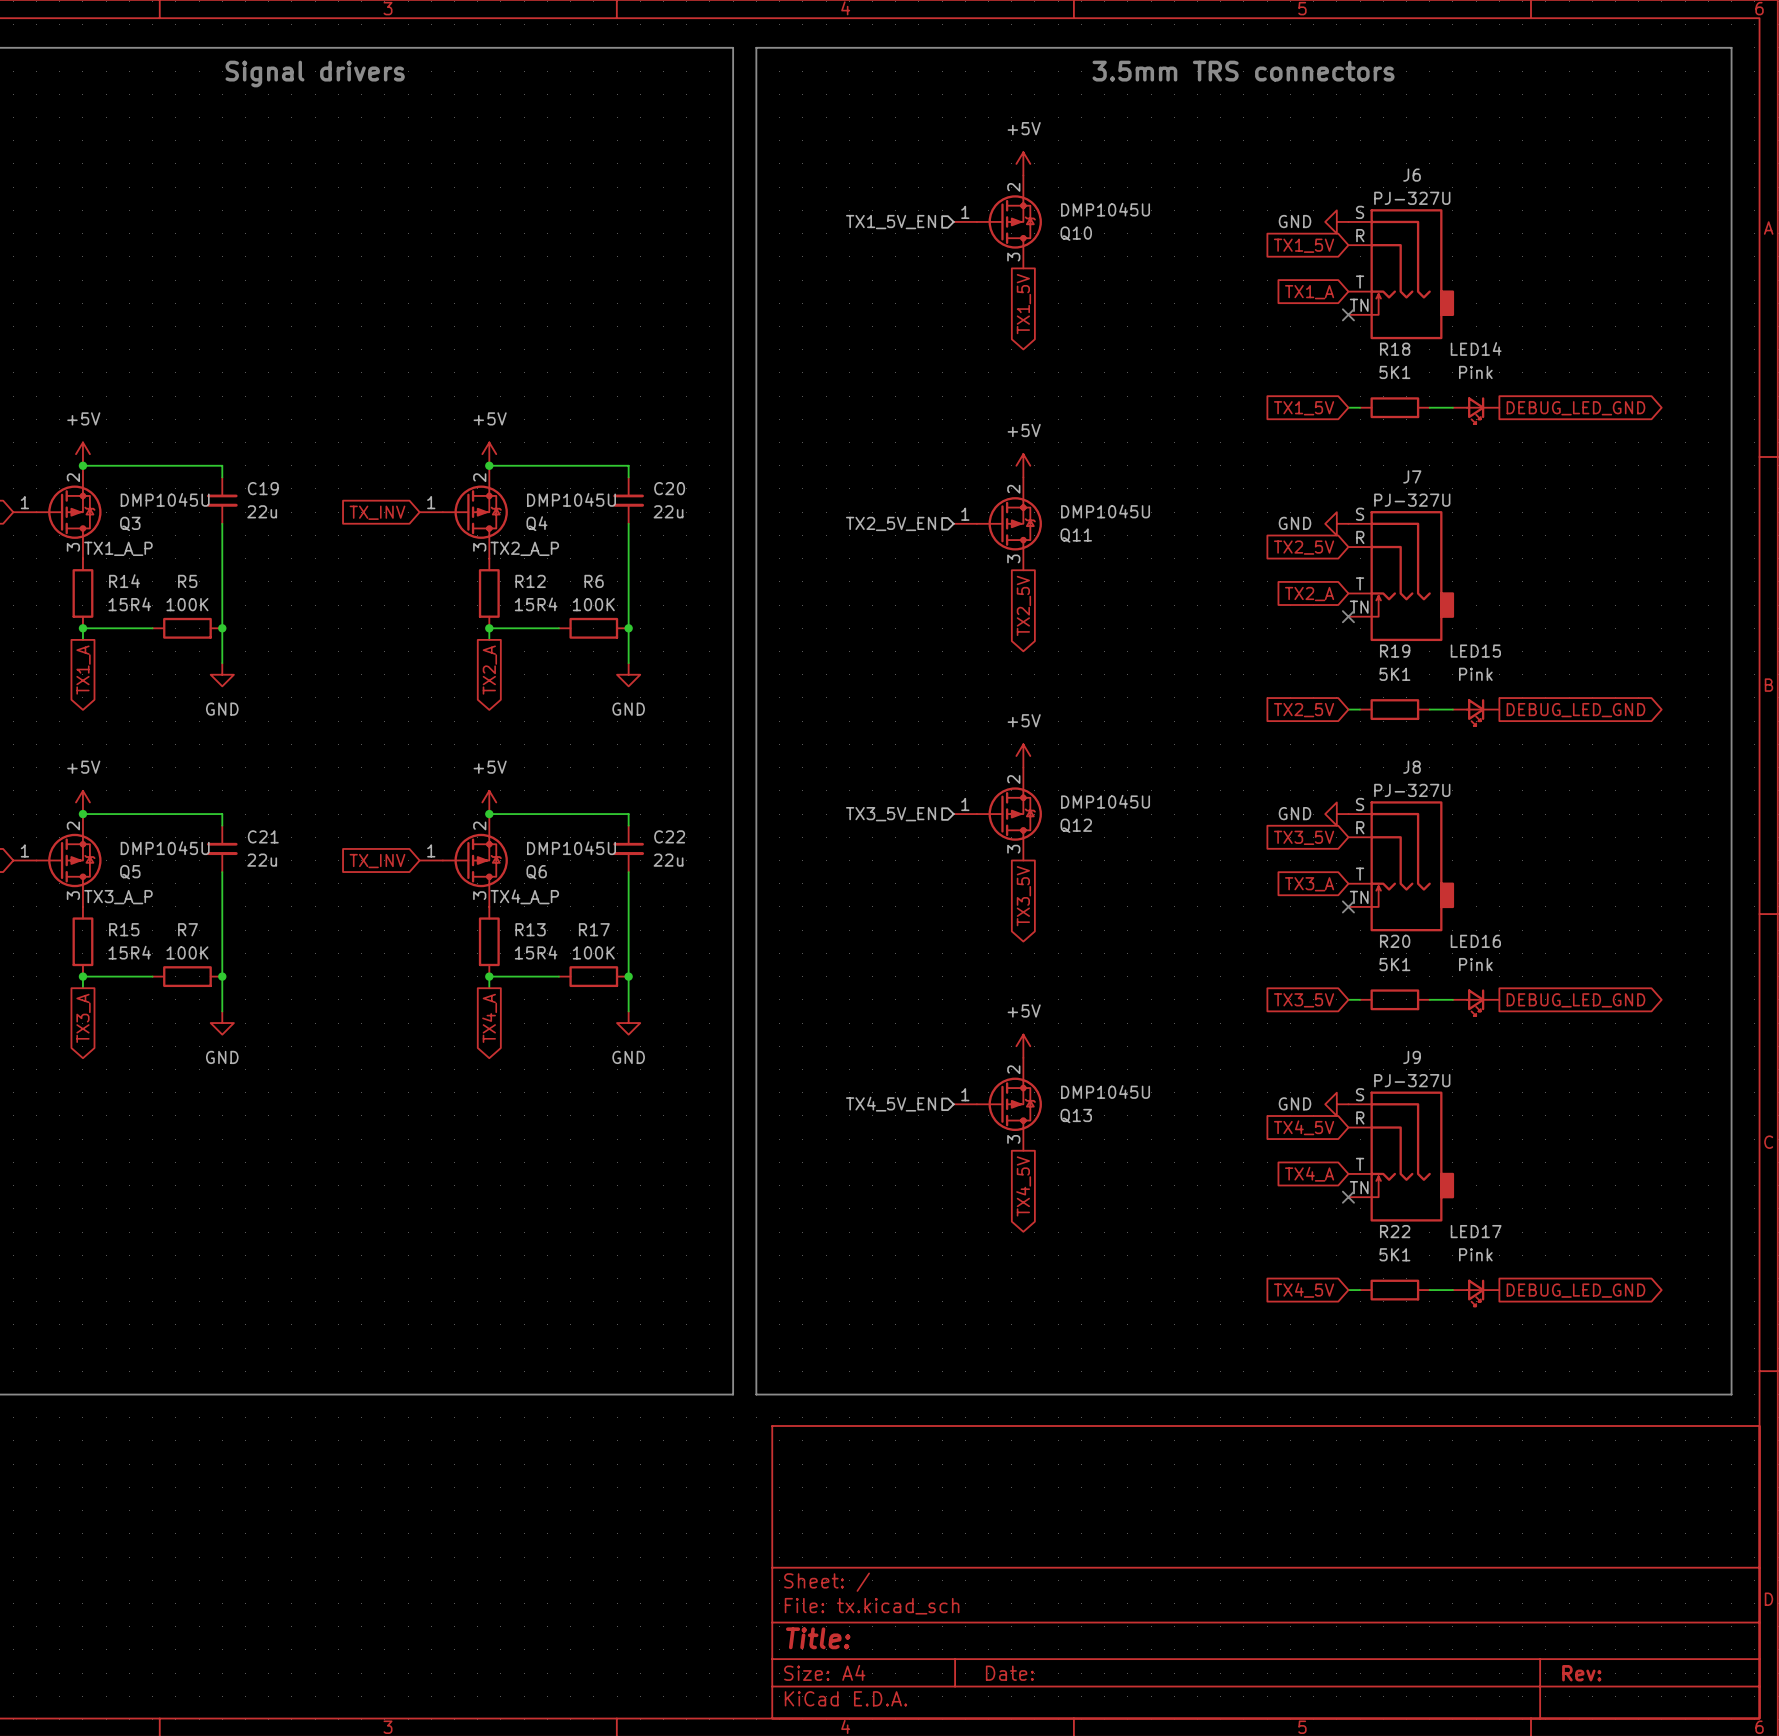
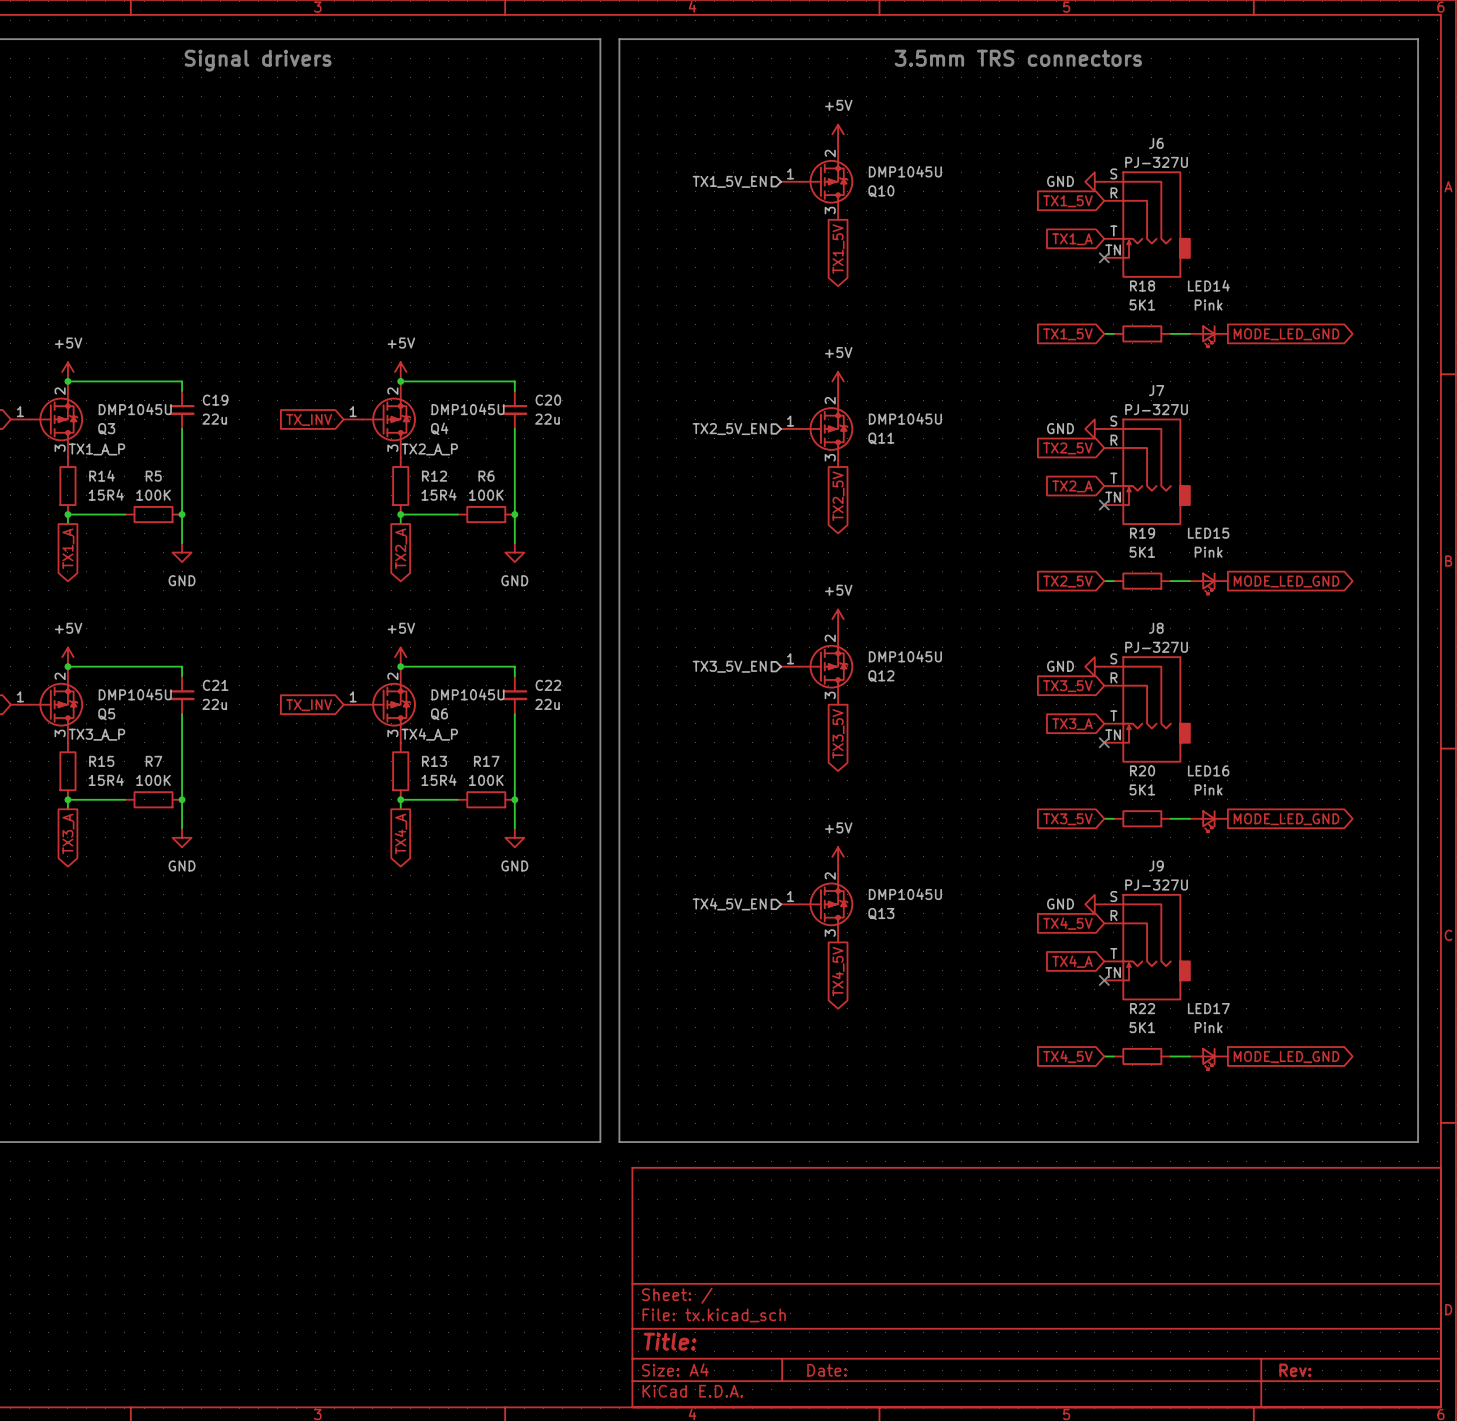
global label: DEBUG_LED_GND (1575, 408) -> MODE_LED_GND (1286, 334)
global label: DEBUG_LED_GND (1575, 710) -> MODE_LED_GND (1286, 581)
global label: DEBUG_LED_GND (1575, 1000) -> MODE_LED_GND (1286, 819)
global label: DEBUG_LED_GND (1575, 1290) -> MODE_LED_GND (1286, 1056)

